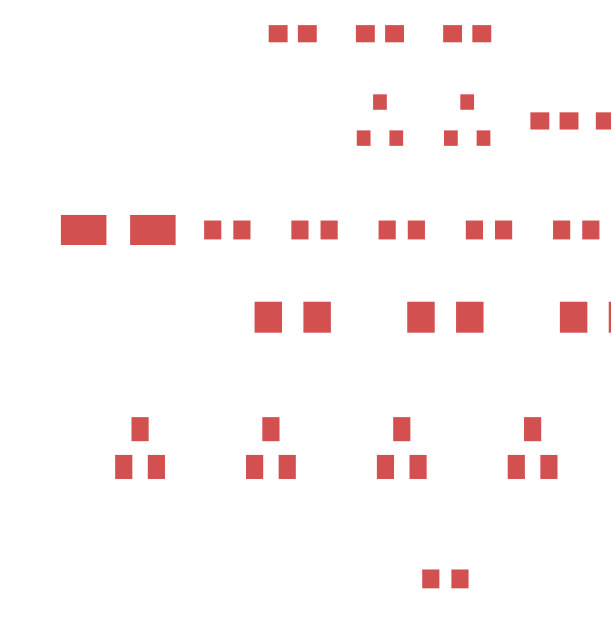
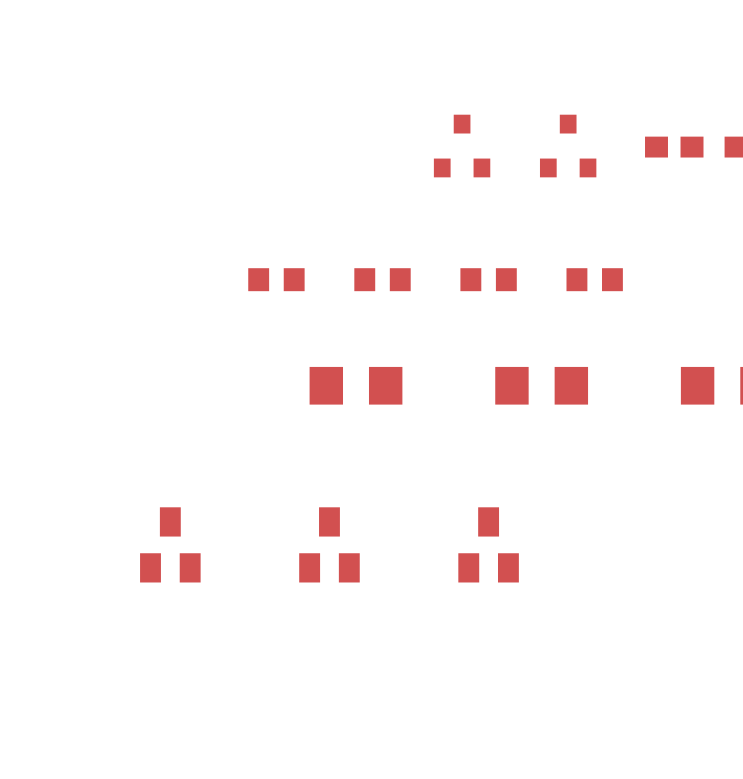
part: (292, 33) -> none
part: (379, 33) -> none
part: (467, 33) -> none
part: (118, 229) -> none
part: (576, 229) -> none
part: (532, 448) -> none
part: (445, 578) -> none

